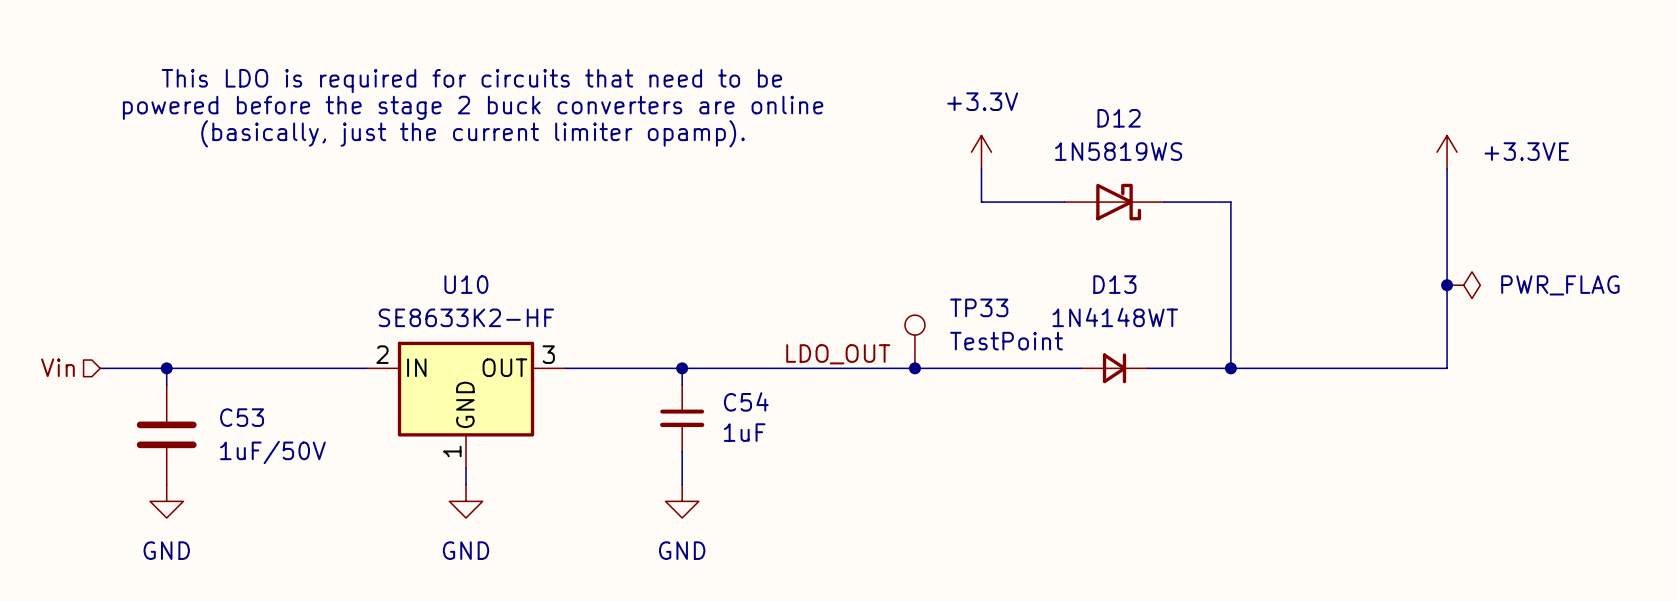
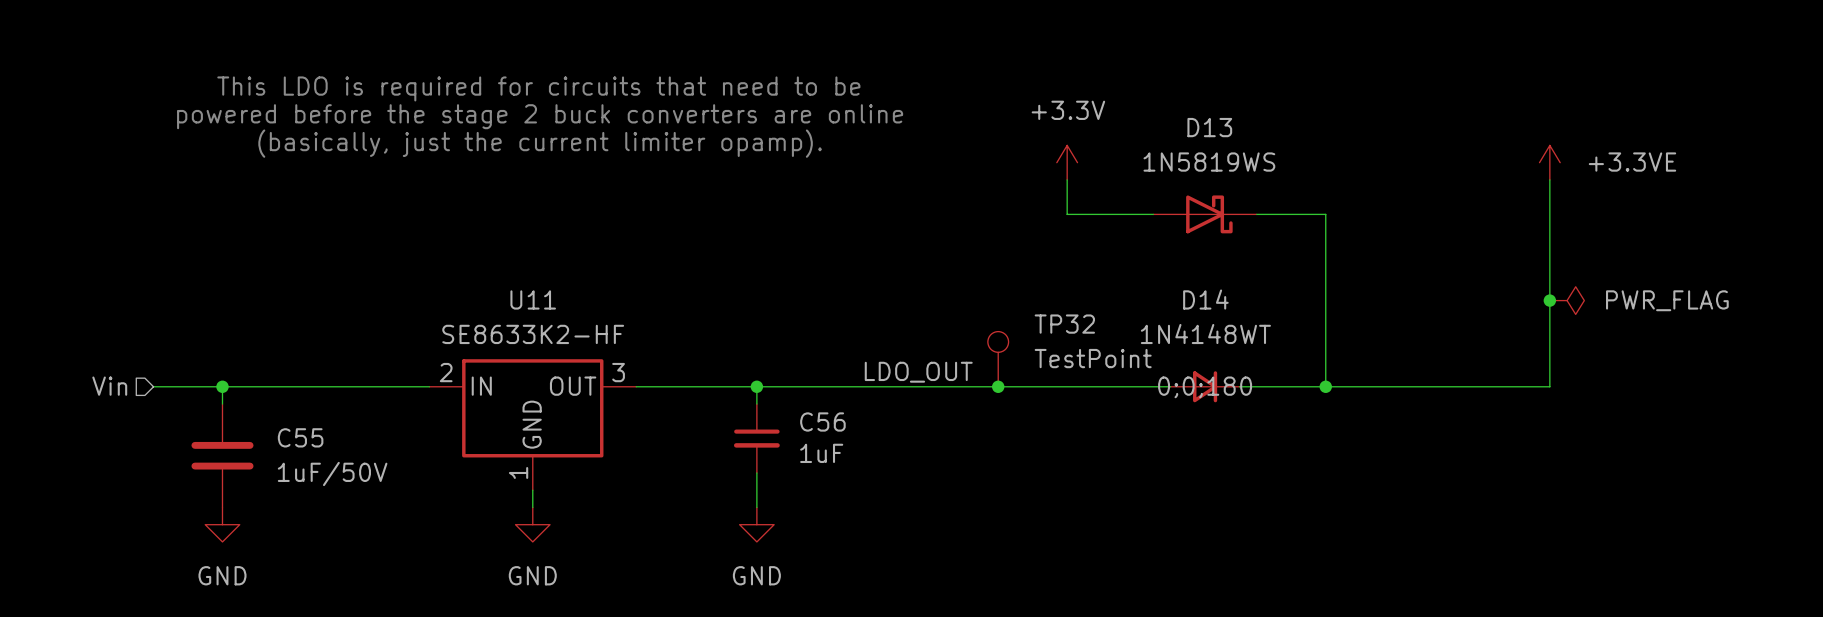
D12 name: D12 (1119, 118) -> D13 (1209, 127)
U10 name: U10 (466, 284) -> U11 (533, 299)
D13 name: D13 (1114, 284) -> D14 (1205, 299)
TP33 name: TP33 (979, 307) -> TP32 (1064, 324)
D13 text: none -> 0;0;180 (1205, 387)
C54 name: C54 (746, 401) -> C56 (822, 421)
C53 name: C53 (242, 417) -> C55 (300, 437)

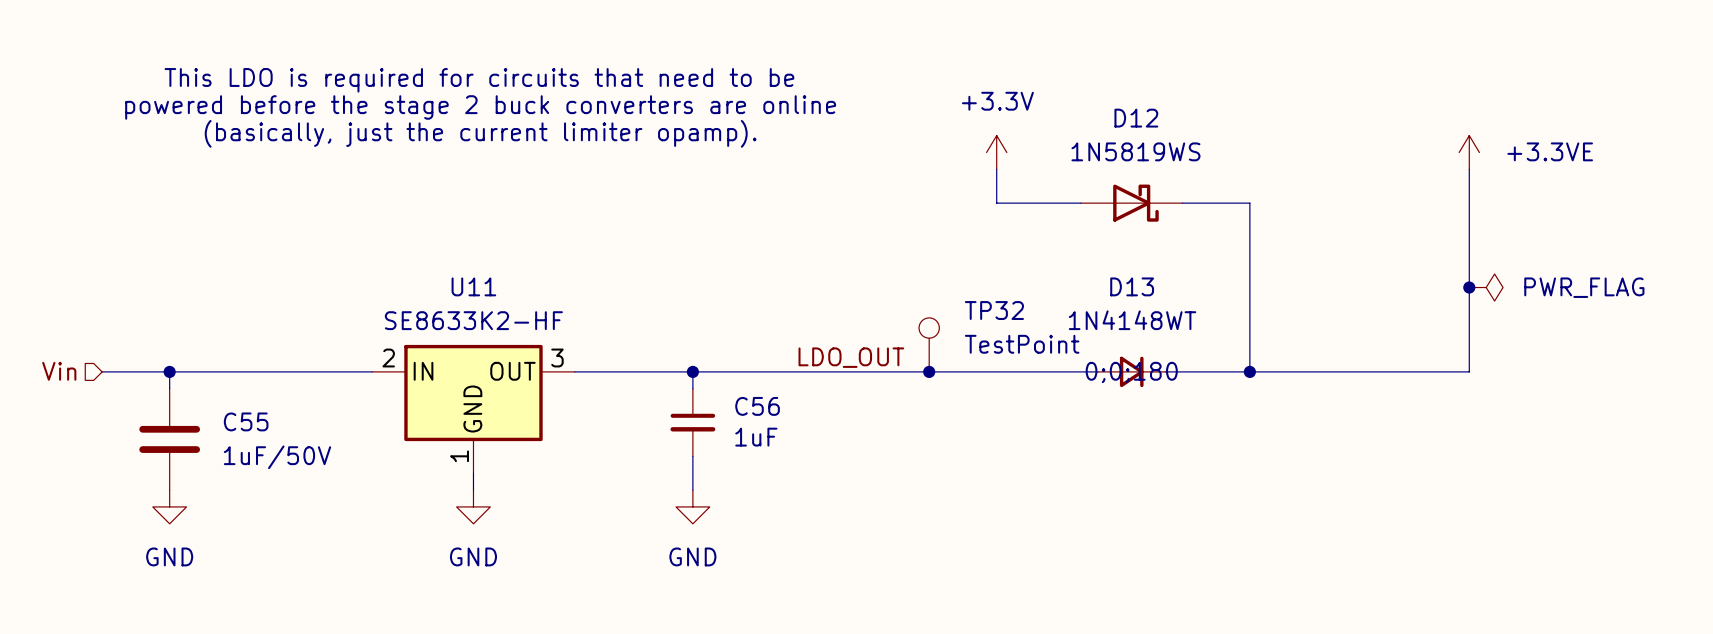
D13 name: D13 (1209, 127) -> D12 (1136, 118)
D14 name: D14 (1205, 299) -> D13 (1132, 286)

